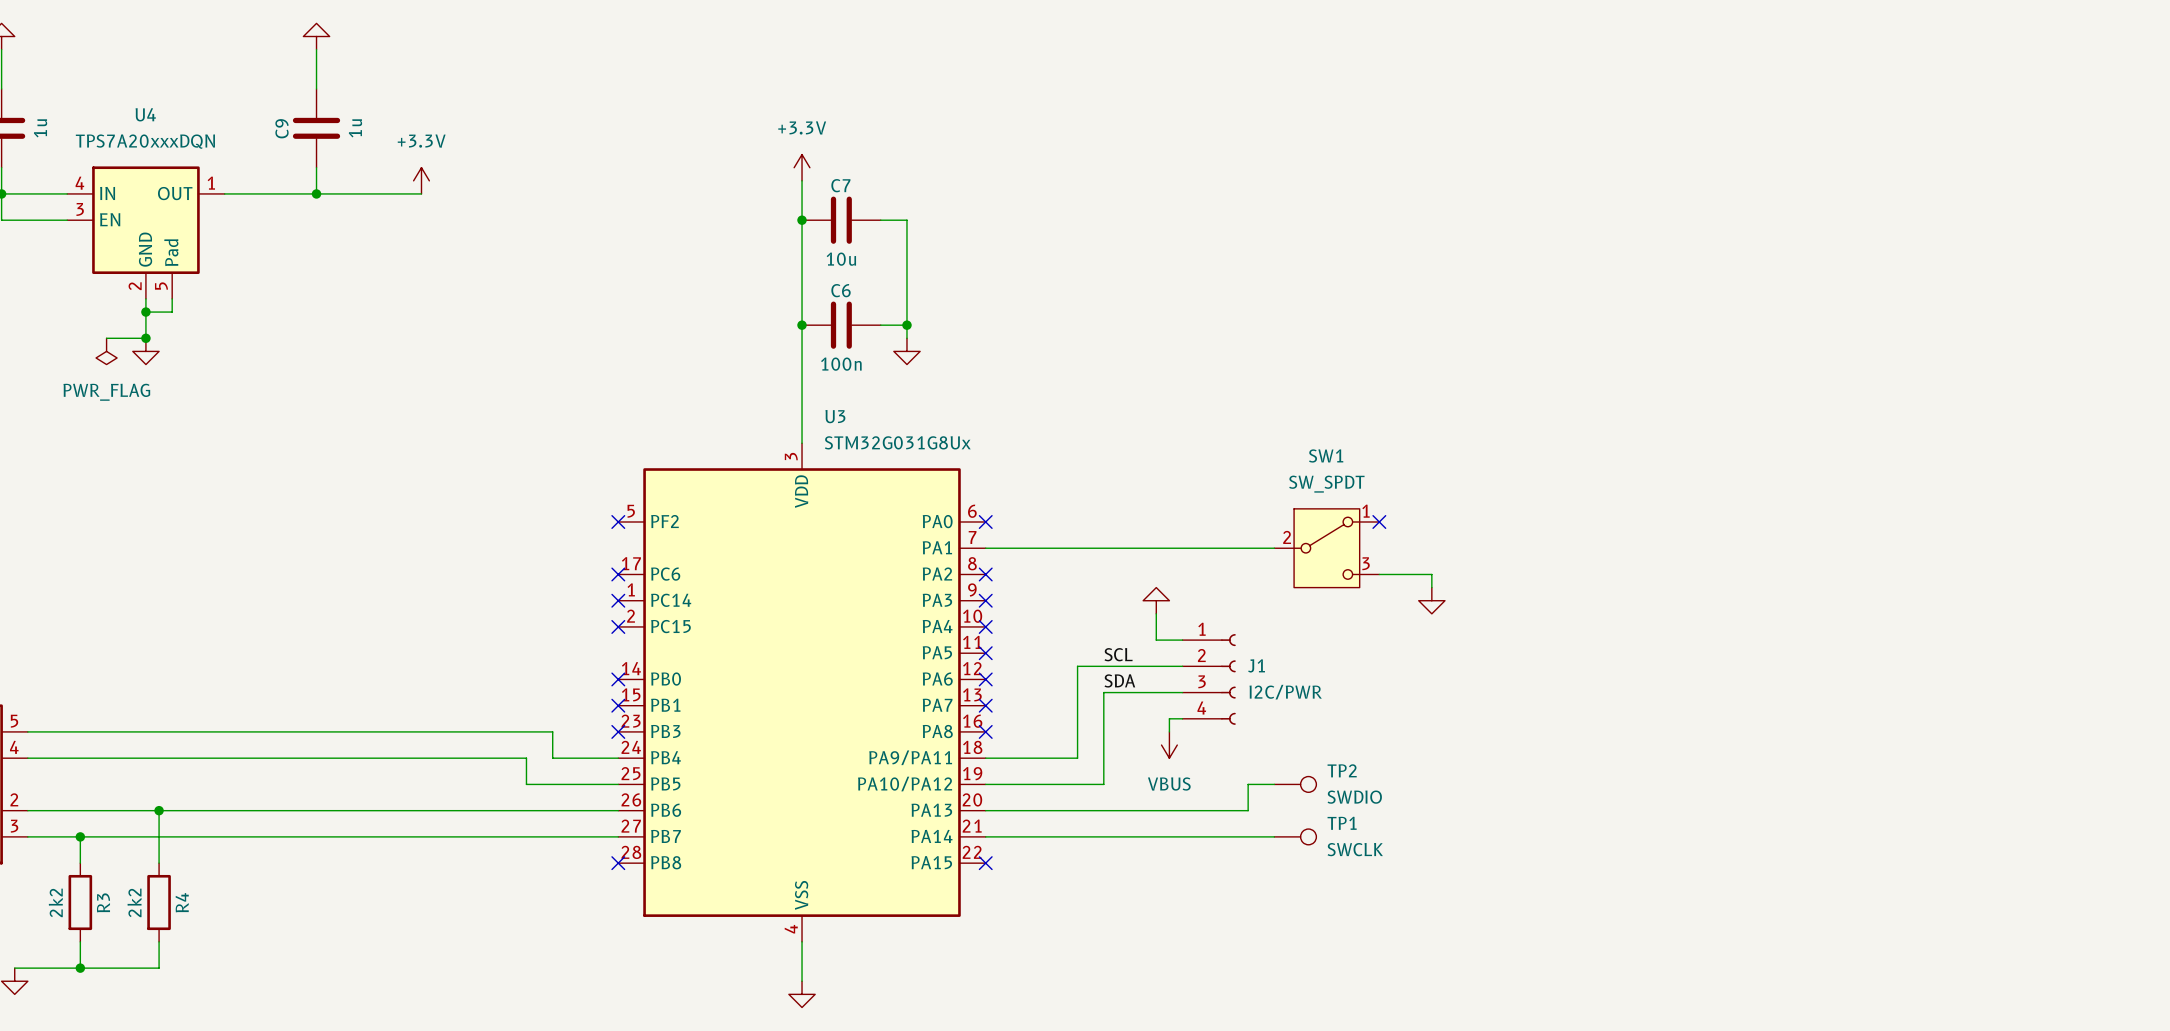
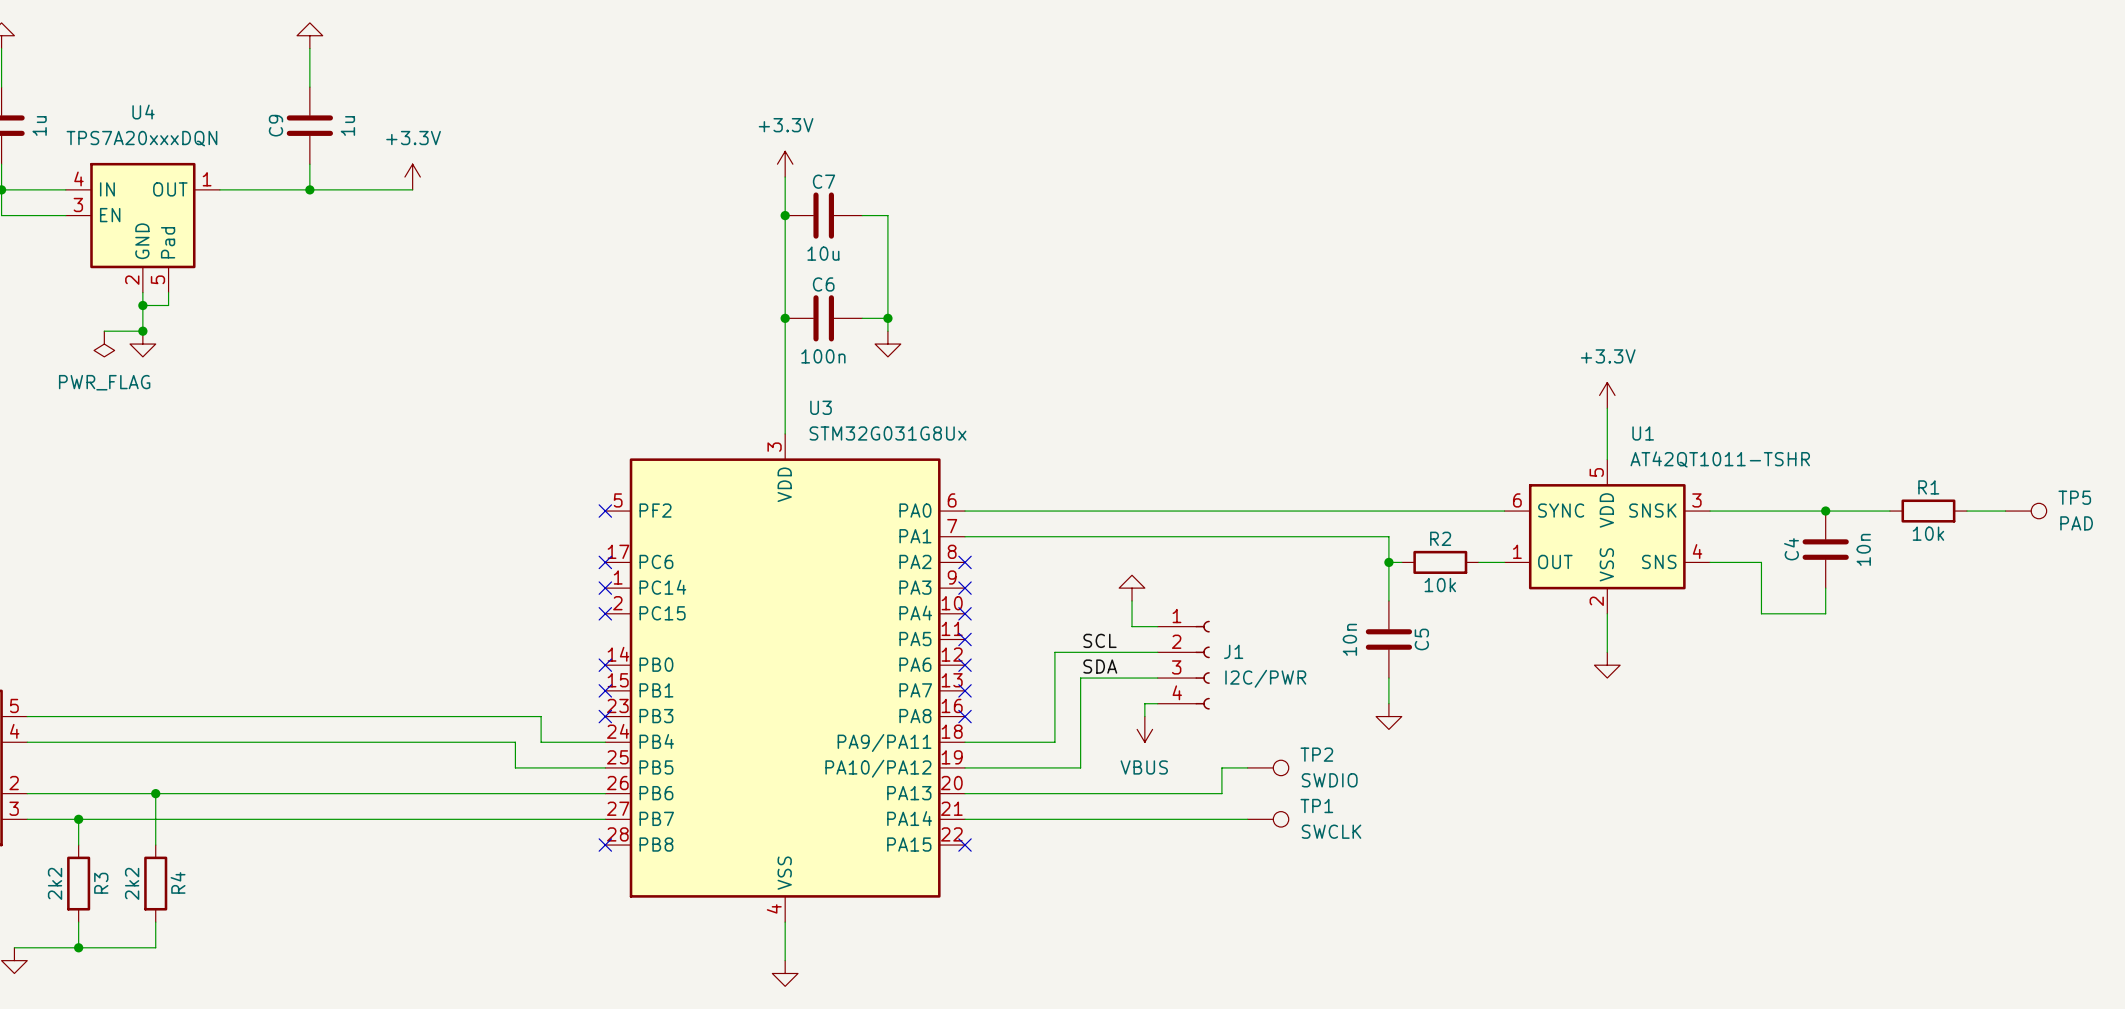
power symbol: none -> +3.3V (1607, 395)
wire: none -> (1607, 408) (1607, 459)
wire: none -> (965, 511) (1504, 511)
no-connect mark: (985, 521) -> none
no-connect mark: (1379, 521) -> none
wire: none -> (1710, 511) (1889, 511)
junction: none -> (1825, 511)
R1: none -> 10k (1928, 511)
wire: none -> (1966, 511) (2005, 511)
TP5: none -> PAD (2026, 511)
wire: none -> (1247, 536) (1388, 536) (1388, 600)
SW1: SW_SPDT (1326, 548) -> none
U1: none -> AT42QT1011-TSHR (1607, 536)
C4: none -> 10n (1825, 549)
wire: (1379, 574) (1418, 574) -> none
junction: none -> (1388, 562)
wire: (1431, 574) (1431, 587) -> none
R2: none -> 10k (1440, 562)
wire: none -> (1478, 562) (1504, 562)
wire: none -> (1710, 562) (1761, 562) (1761, 613) (1825, 613) (1825, 588)
power symbol: (1431, 600) -> none
wire: none -> (1607, 613) (1607, 652)
C5: none -> 10n (1388, 639)
power symbol: none -> (1607, 665)
wire: none -> (1388, 678) (1388, 703)
power symbol: none -> (1388, 716)

